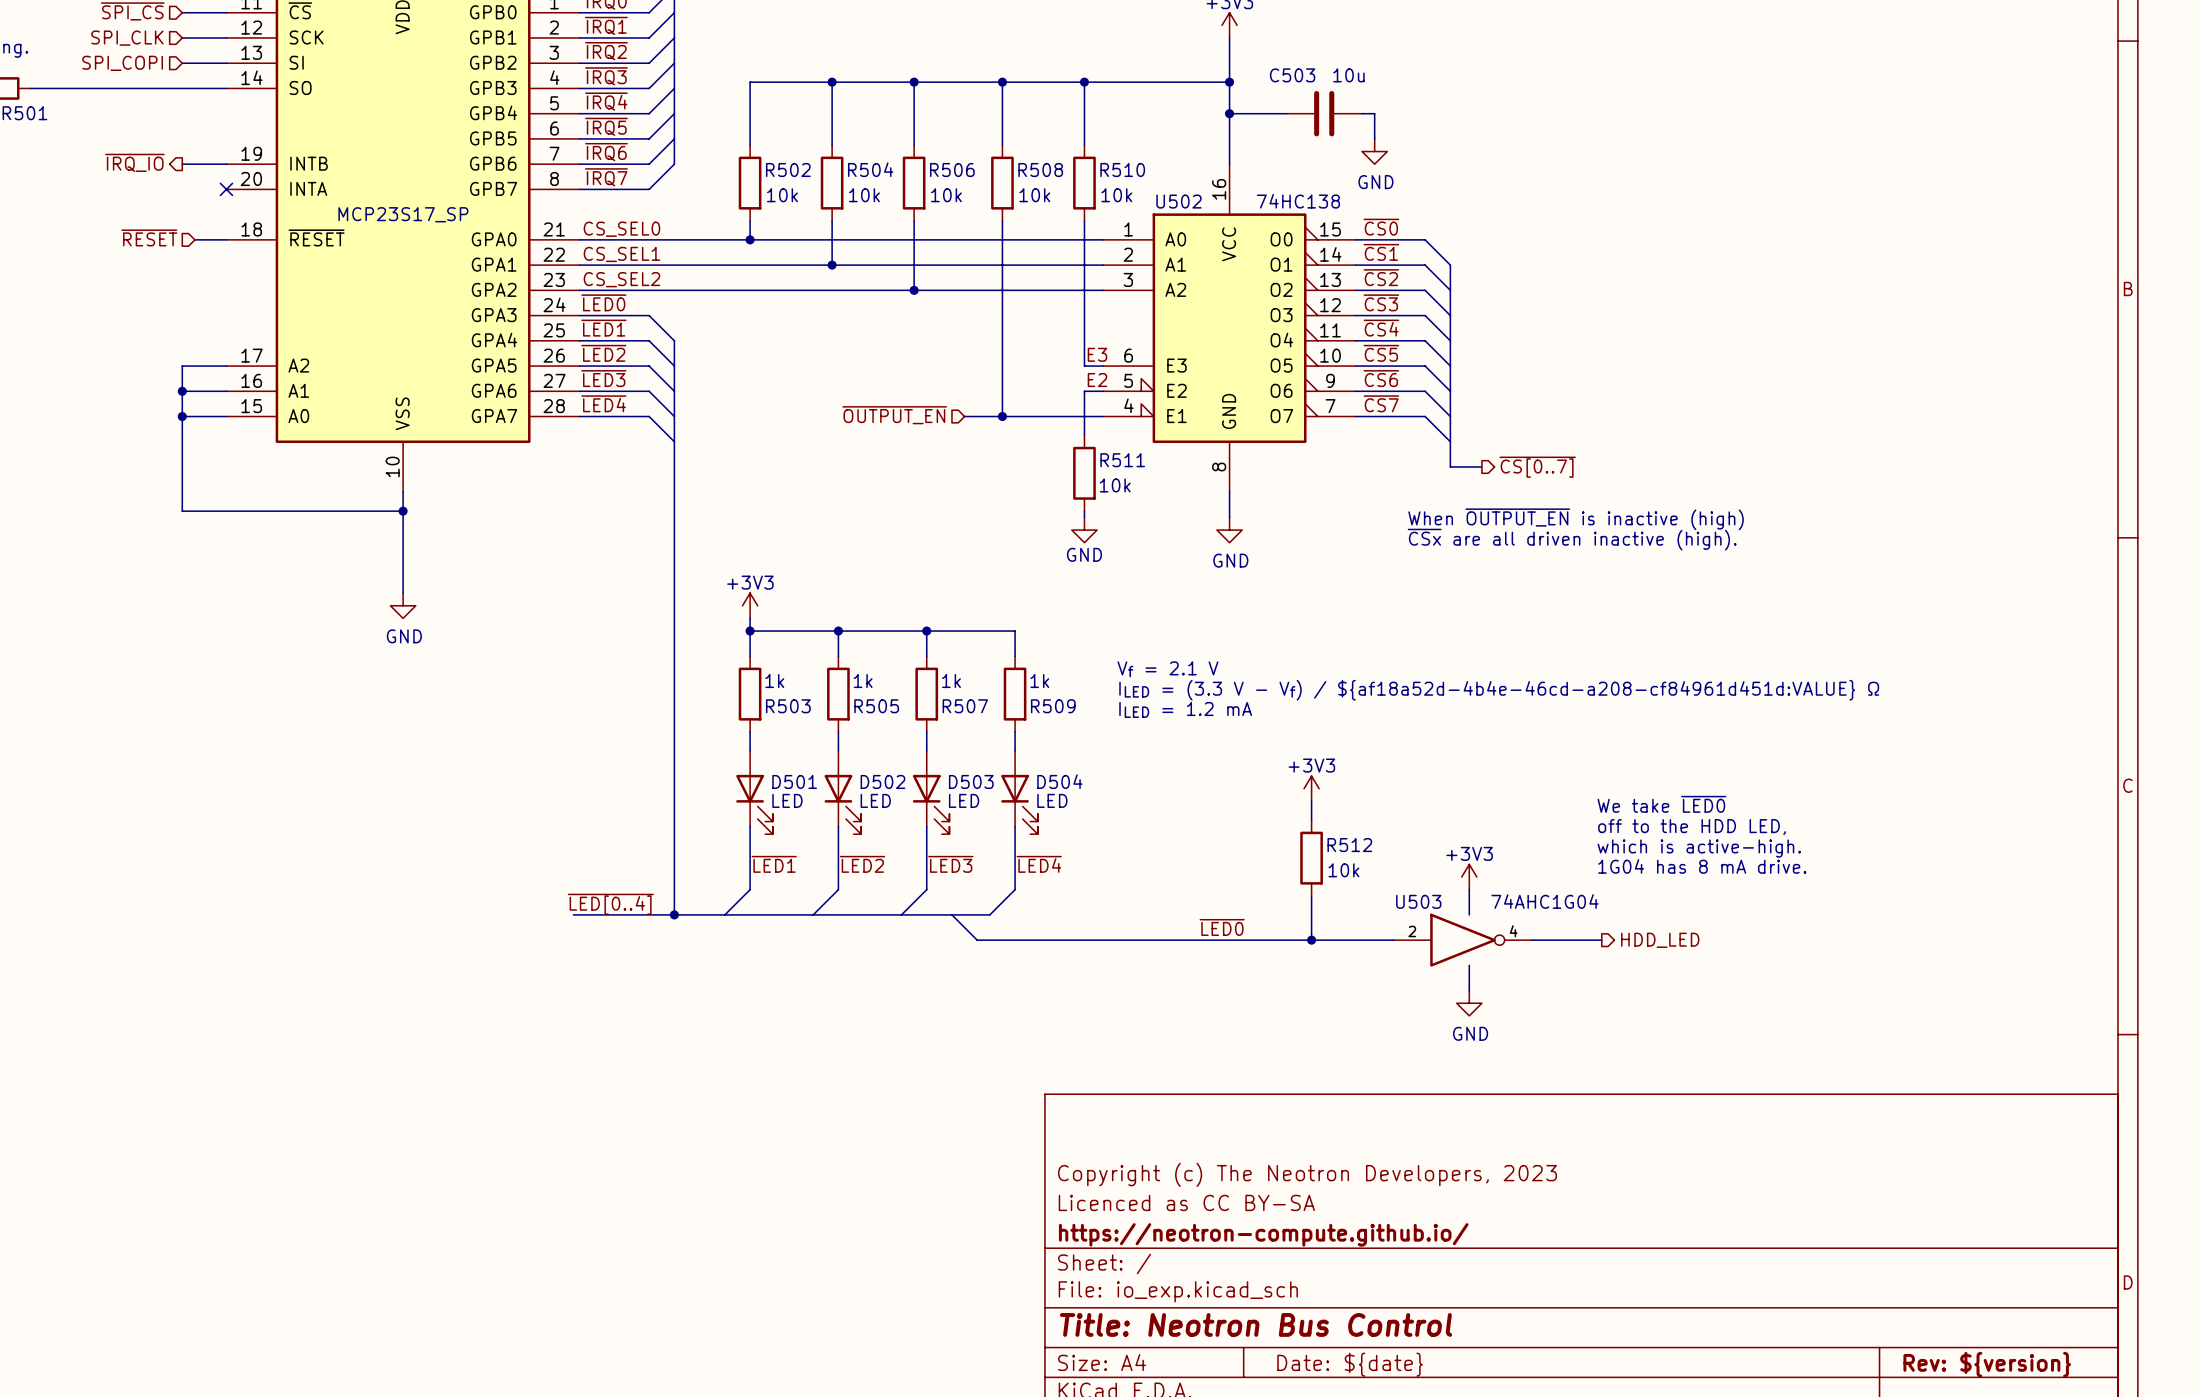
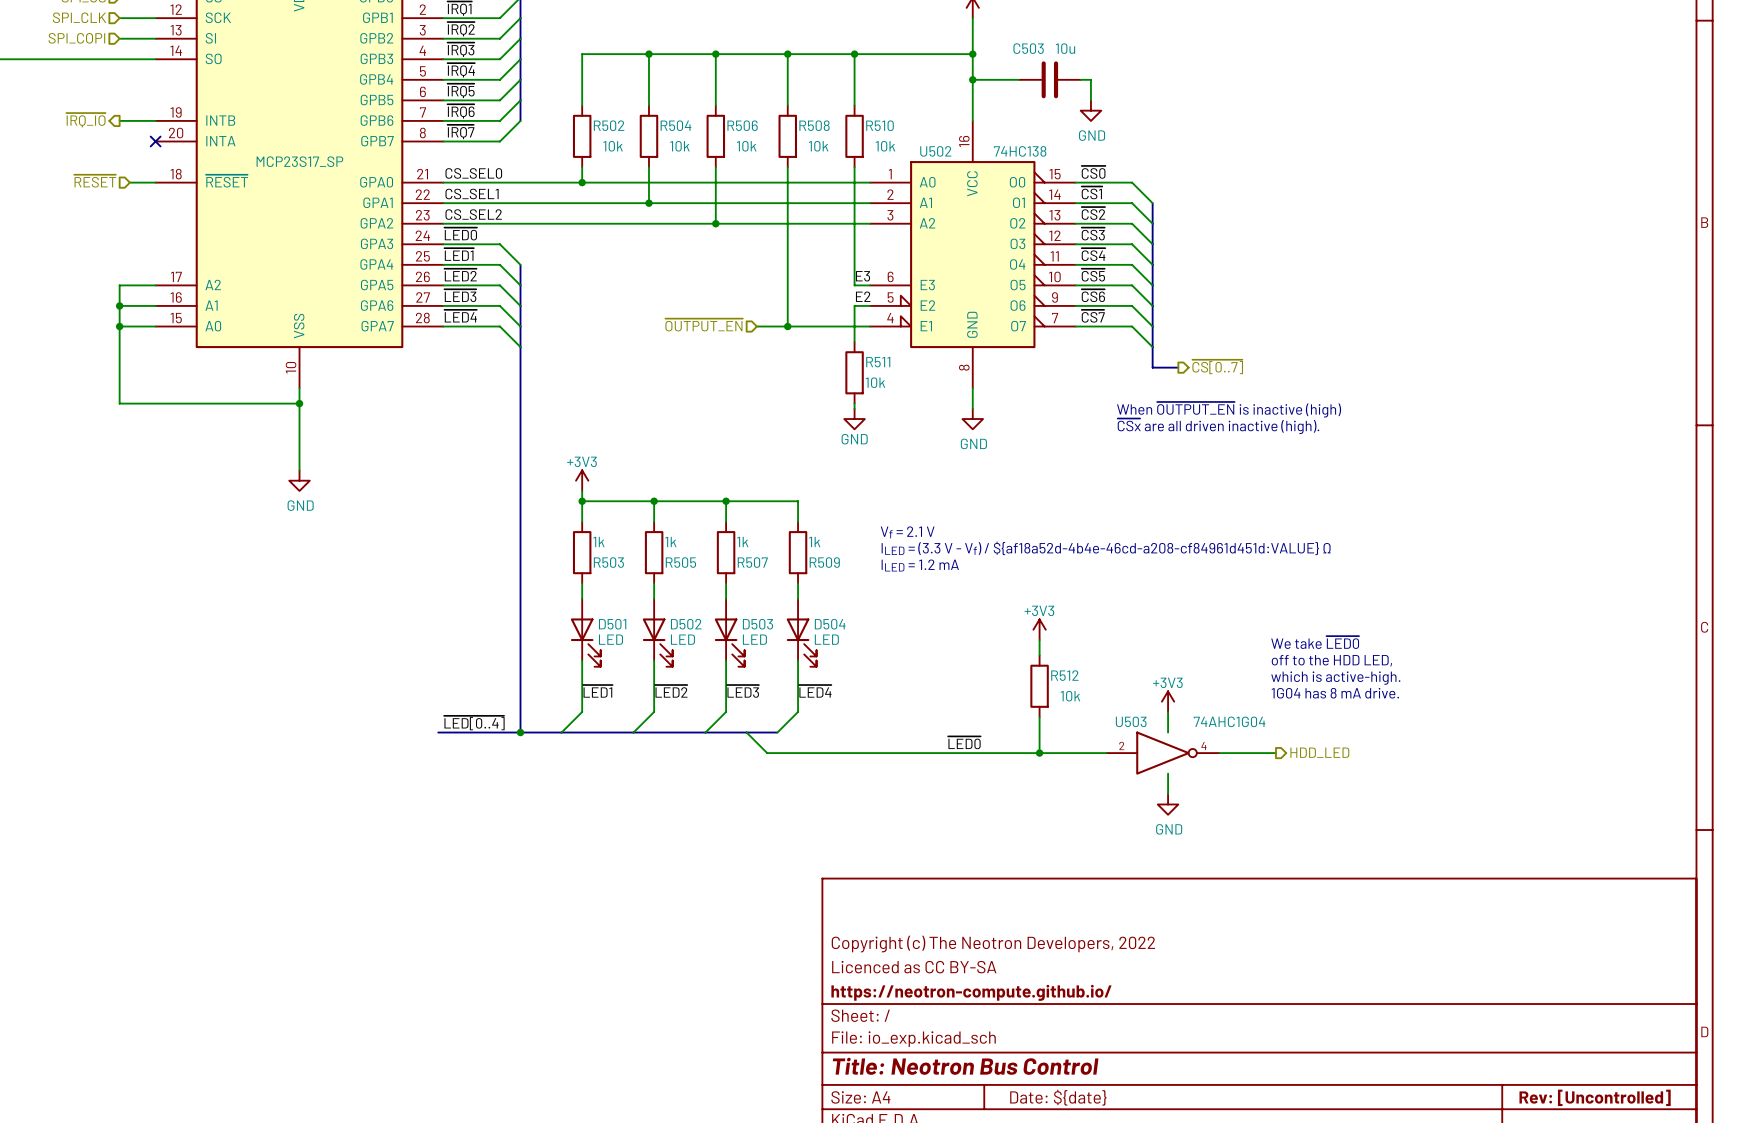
title block: Copyright (c) The Neotron Developers, 2023 (1307, 1174) -> Copyright (c) The Neotron Developers, 2022 (993, 944)
title block: Rev: ${version} (1987, 1364) -> Rev: [Uncontrolled] (1595, 1097)

